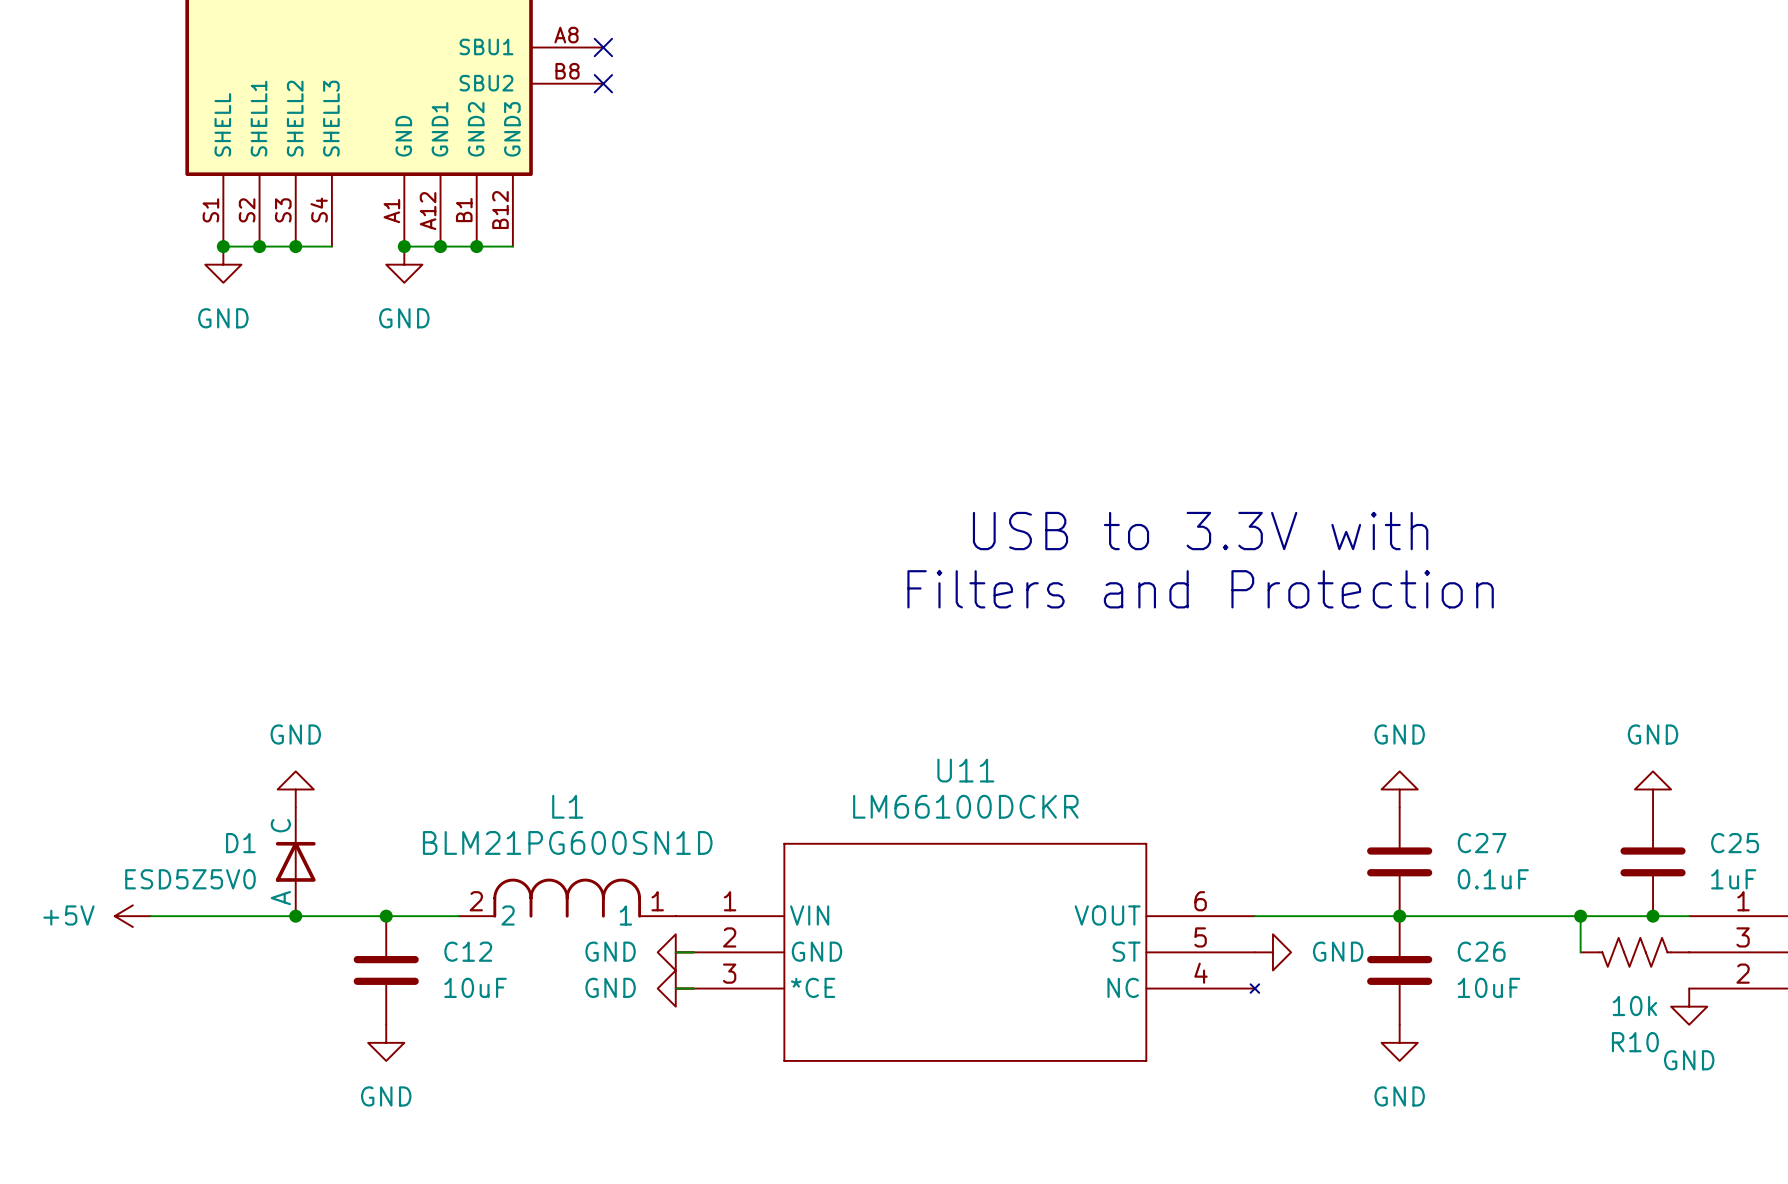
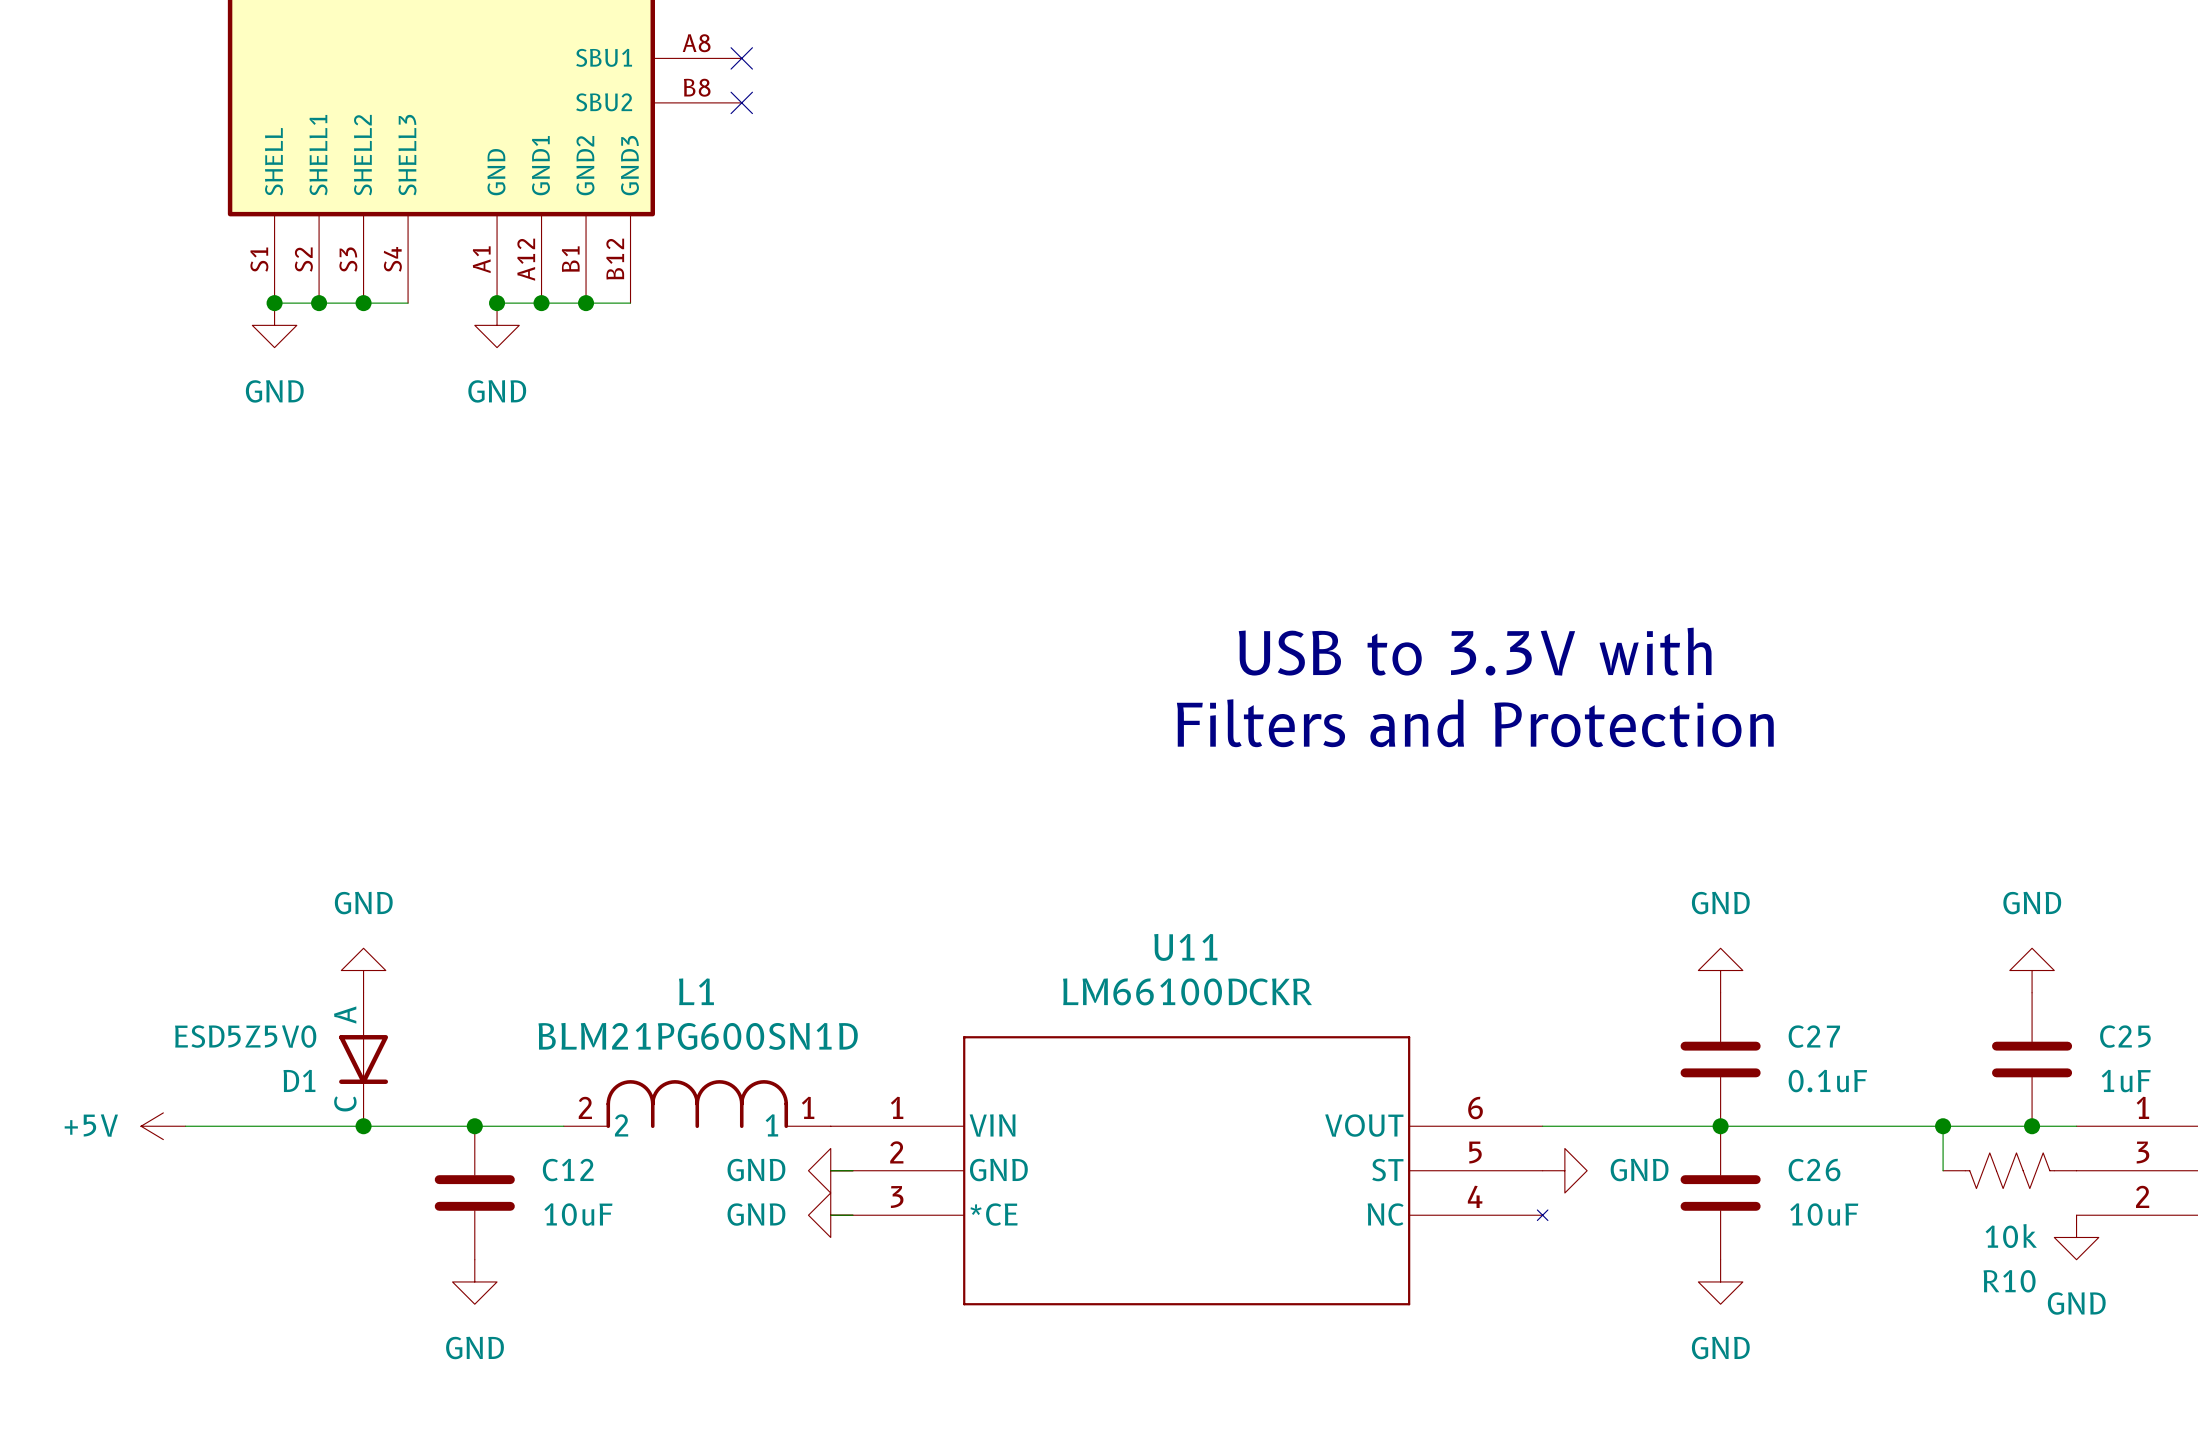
D1 name position: D1 (240, 843) -> D1 (299, 1080)
D1 rotation: 0° (295, 861) -> 180° (363, 1059)
D1 value position: ESD5Z5V0 (190, 879) -> ESD5Z5V0 (245, 1036)

